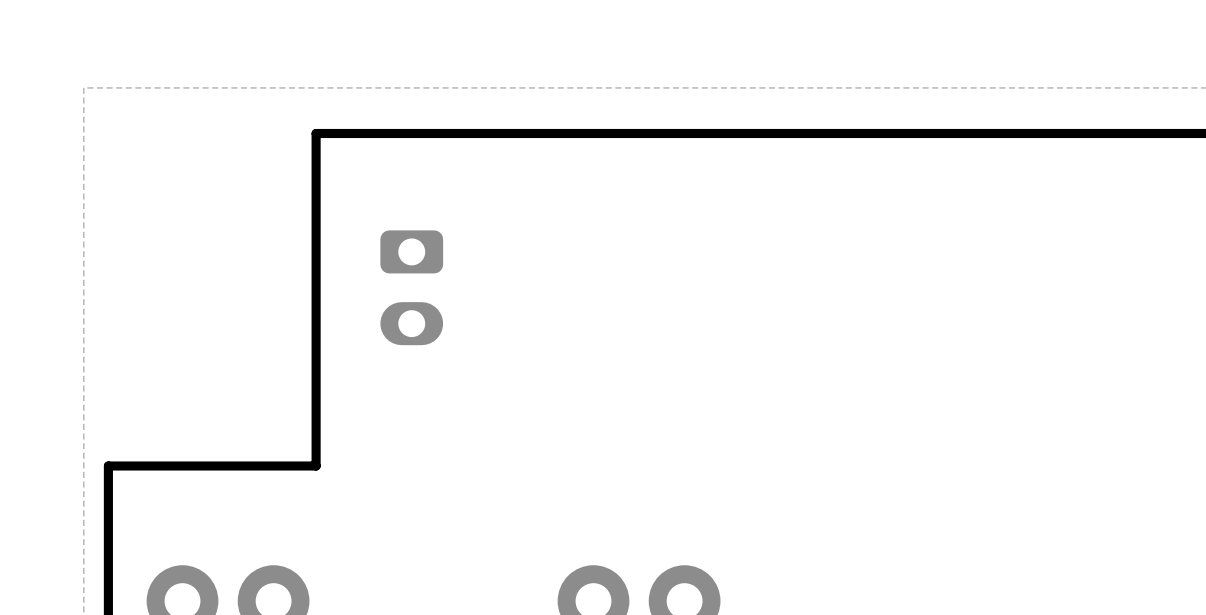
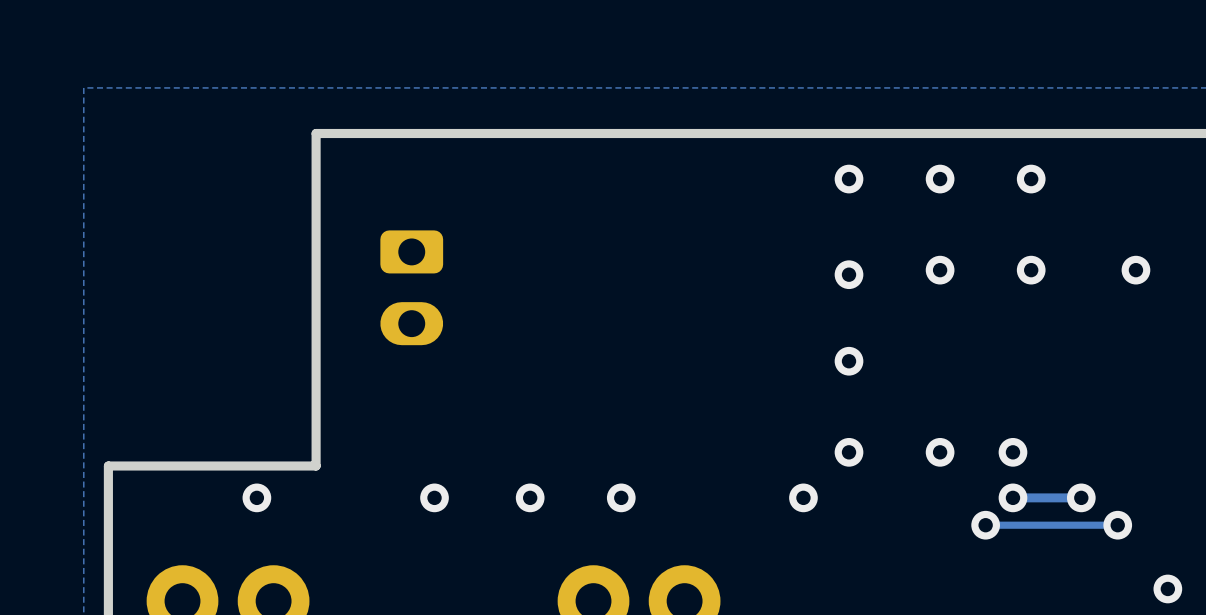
via: none -> (849, 179)
via: none -> (940, 179)
via: none -> (1031, 179)
via: none -> (940, 270)
via: none -> (1031, 270)
via: none -> (1135, 270)
via: none -> (849, 274)
via: none -> (849, 361)
via: none -> (849, 452)
via: none -> (940, 452)
via: none -> (1012, 452)
via: none -> (256, 497)
via: none -> (434, 497)
via: none -> (530, 497)
via: none -> (621, 497)
via: none -> (803, 497)
via: none -> (1012, 497)
track: none -> (1081, 497) (1012, 497)
via: none -> (1081, 497)
via: none -> (985, 525)
track: none -> (1117, 525) (985, 525)
via: none -> (1117, 525)
via: none -> (1167, 588)

